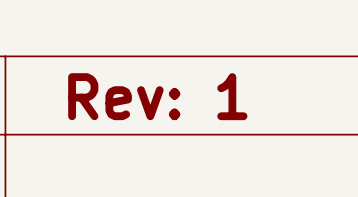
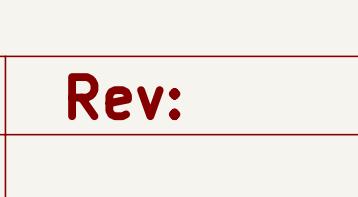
title block: Rev: 1 (157, 96) -> Rev: (124, 96)

